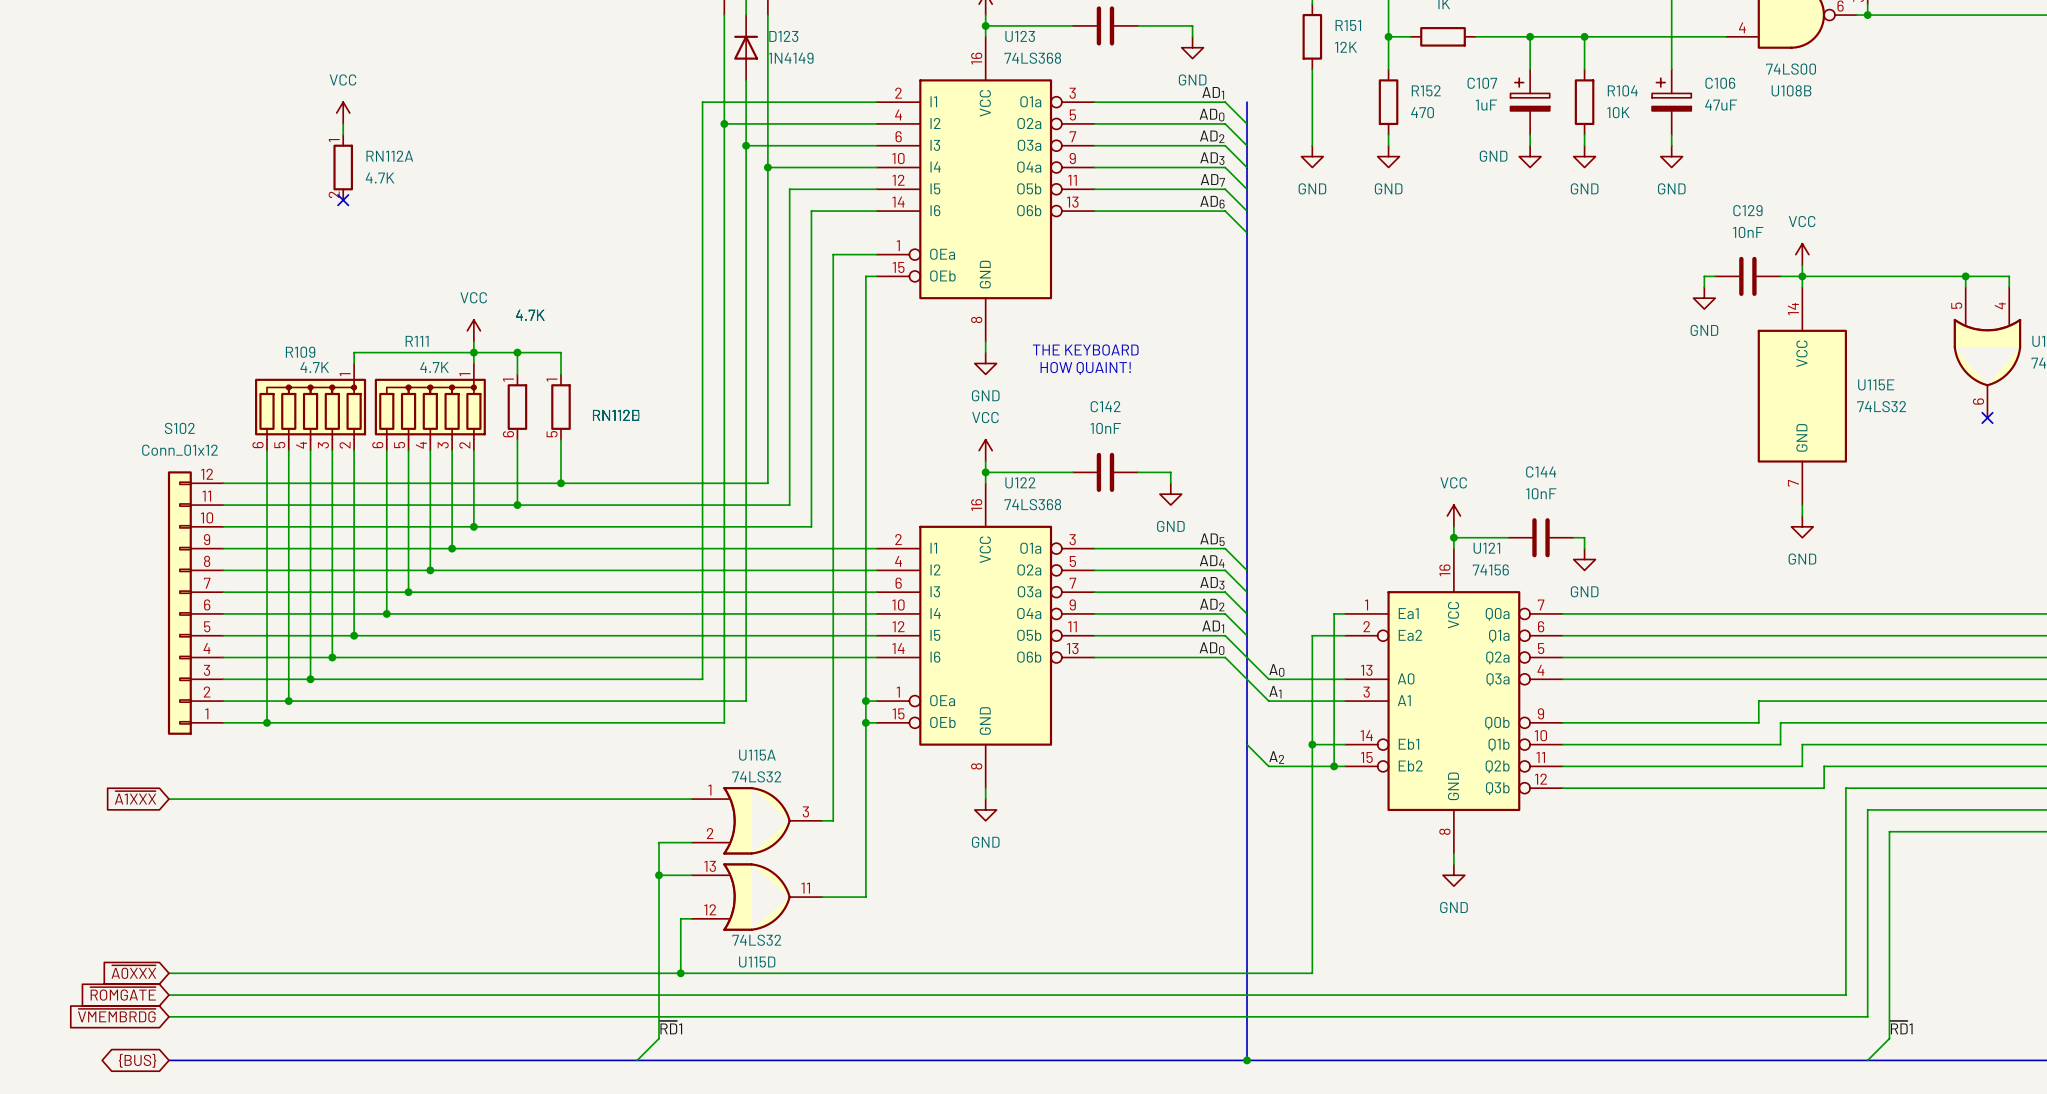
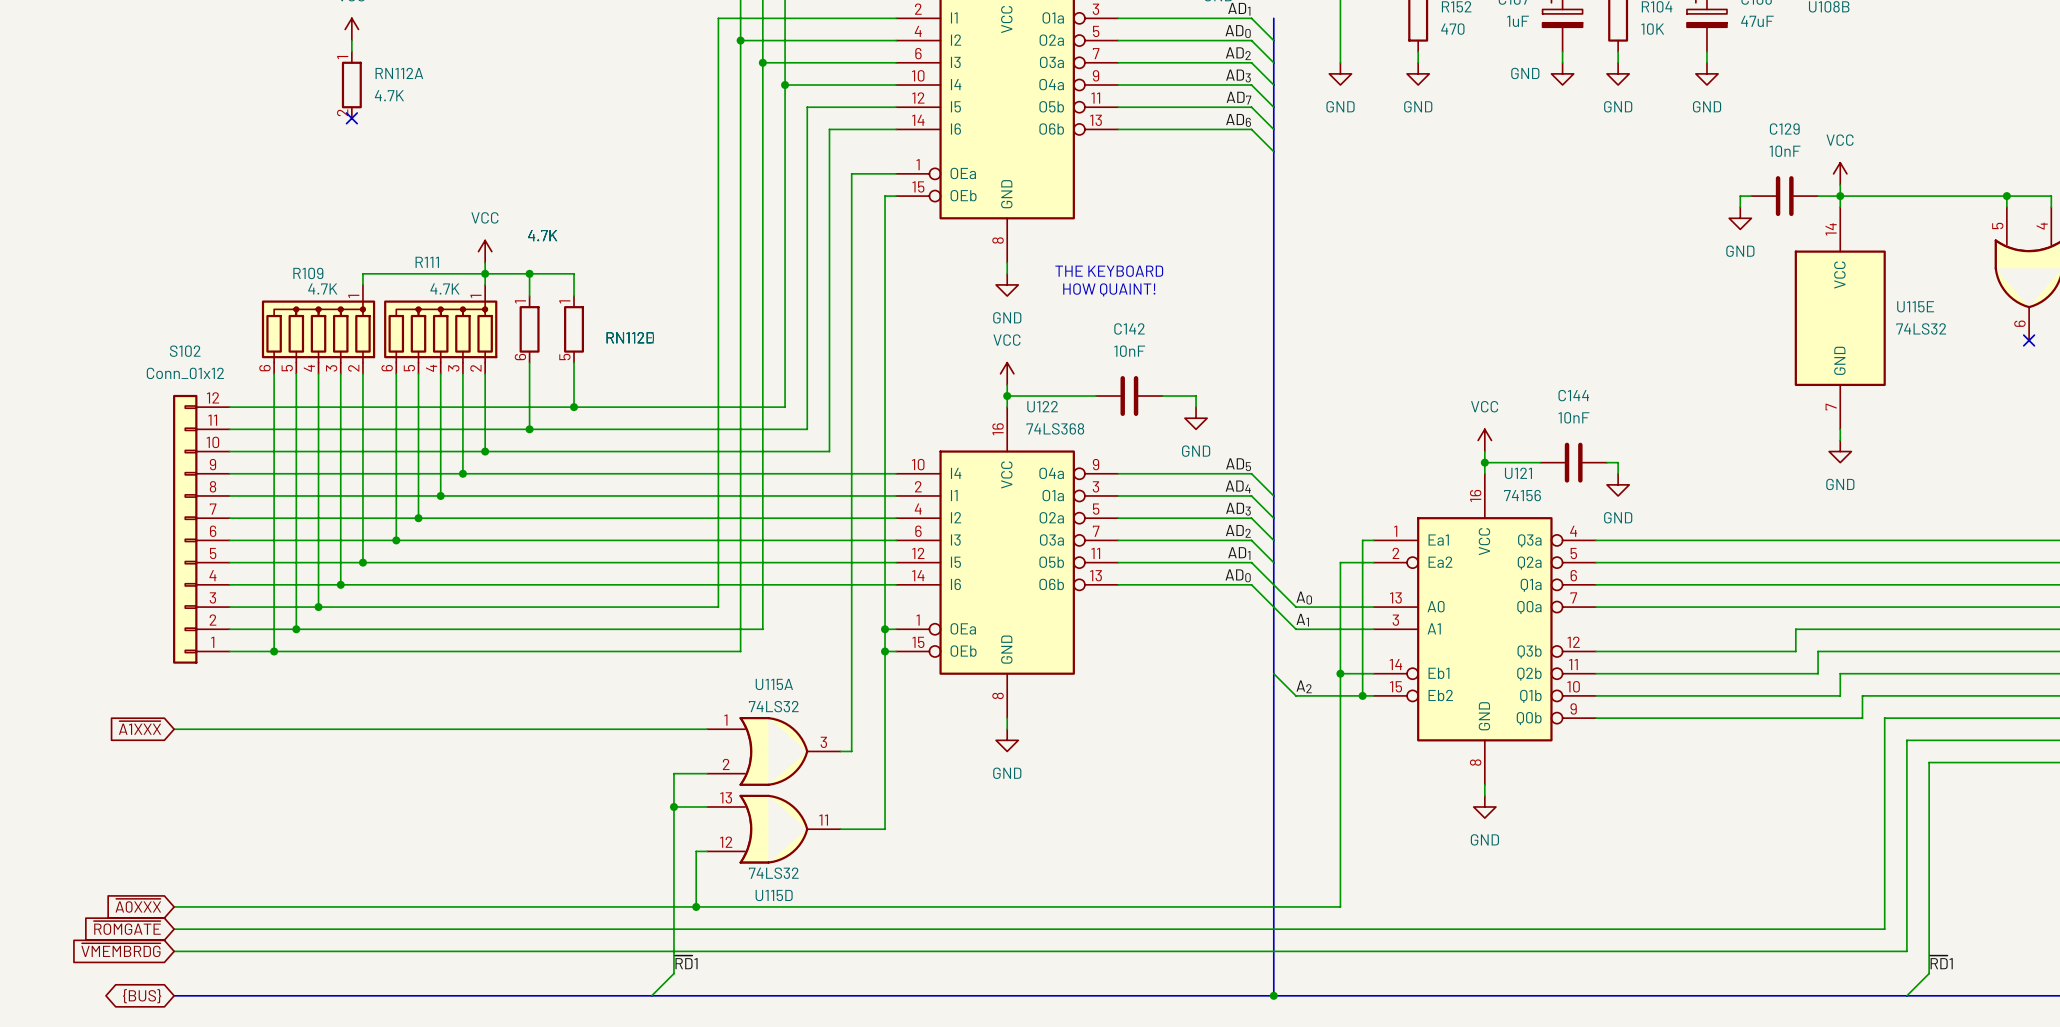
U122 symbol: [876, 483, 1095, 789] -> [896, 407, 1119, 719]
U121 symbol: [1345, 548, 1563, 854] -> [1373, 473, 1596, 785]

